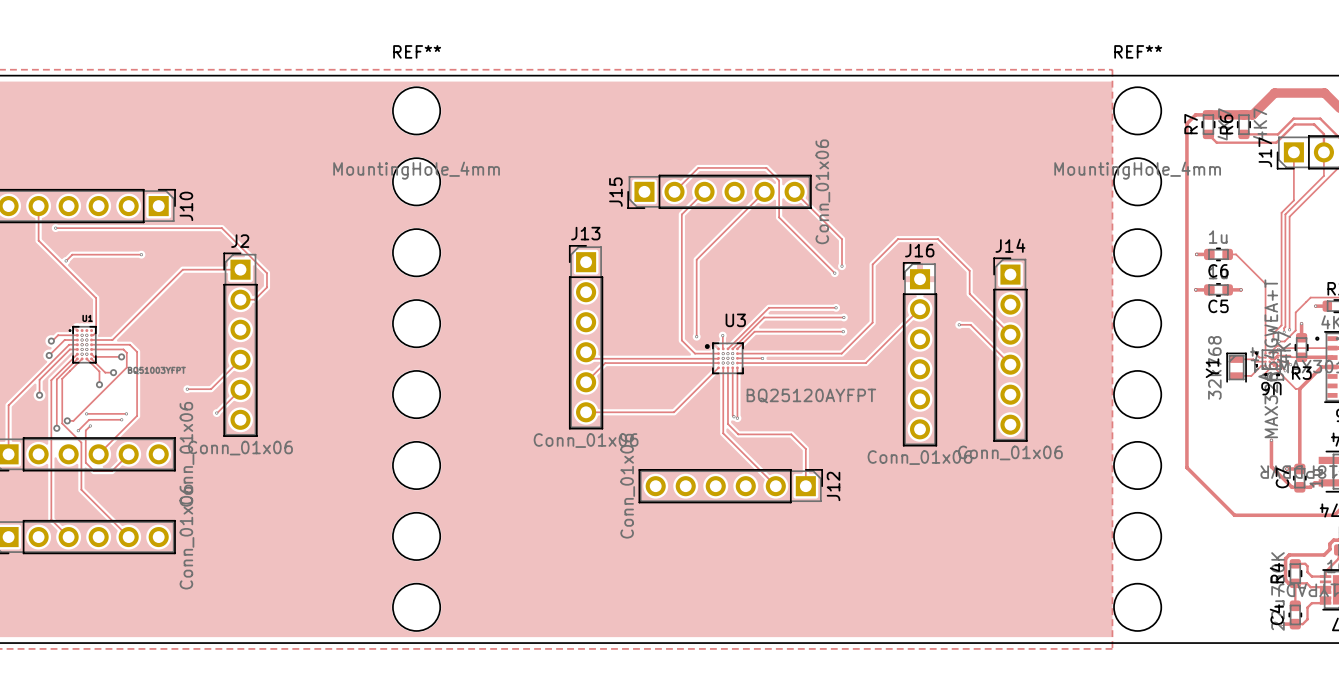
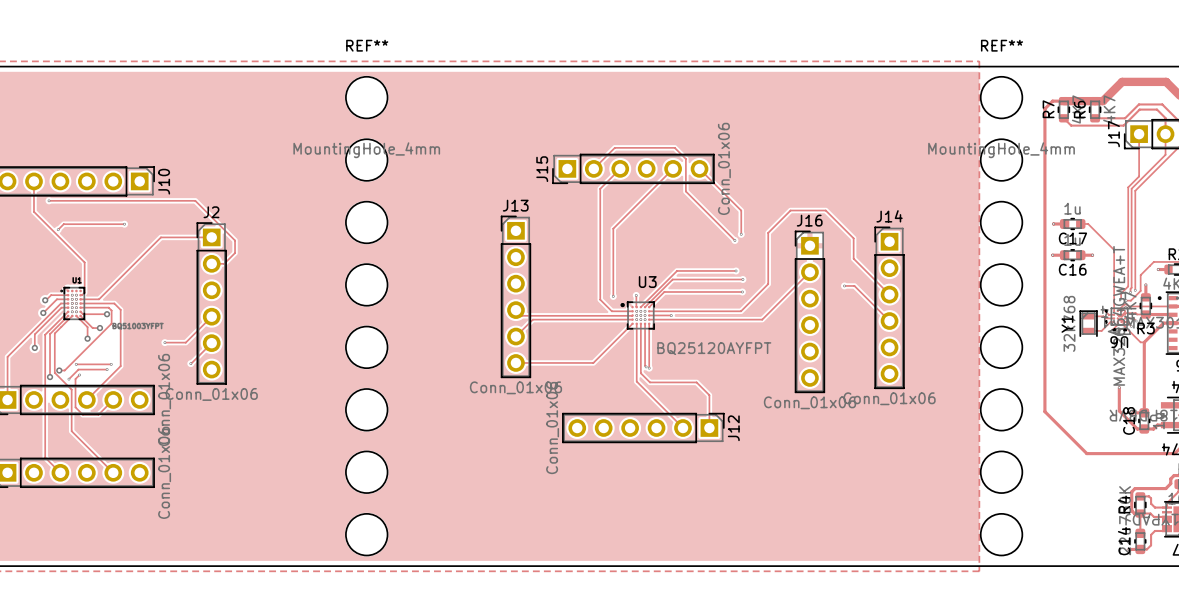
C6 name: C6 (1218, 270) -> C17 (1072, 238)
C5 name: C5 (1218, 306) -> C16 (1072, 269)
C7 name: C7 (1282, 477) -> C18 (1129, 420)
C4 name: C4 (1276, 614) -> C14 (1124, 541)

